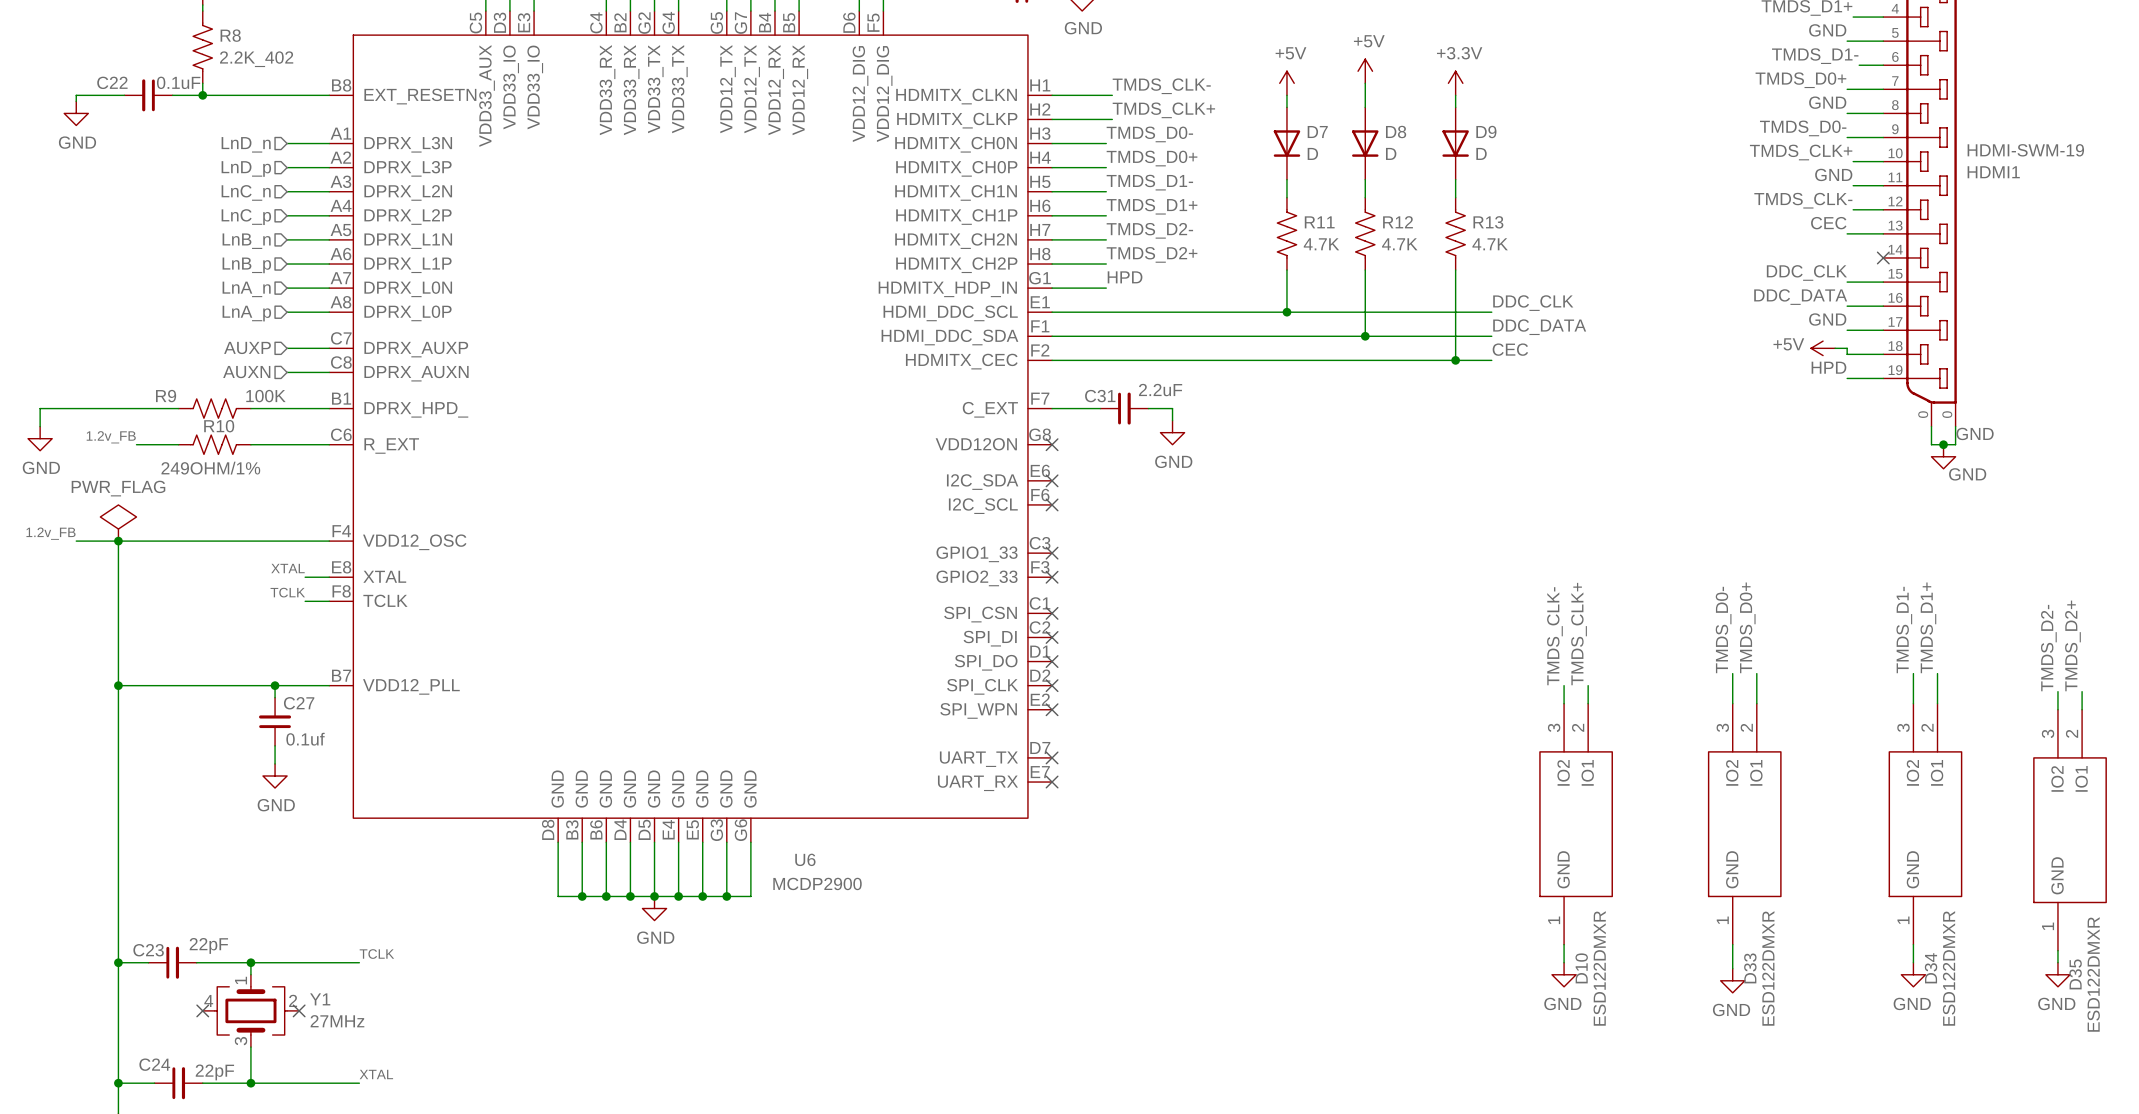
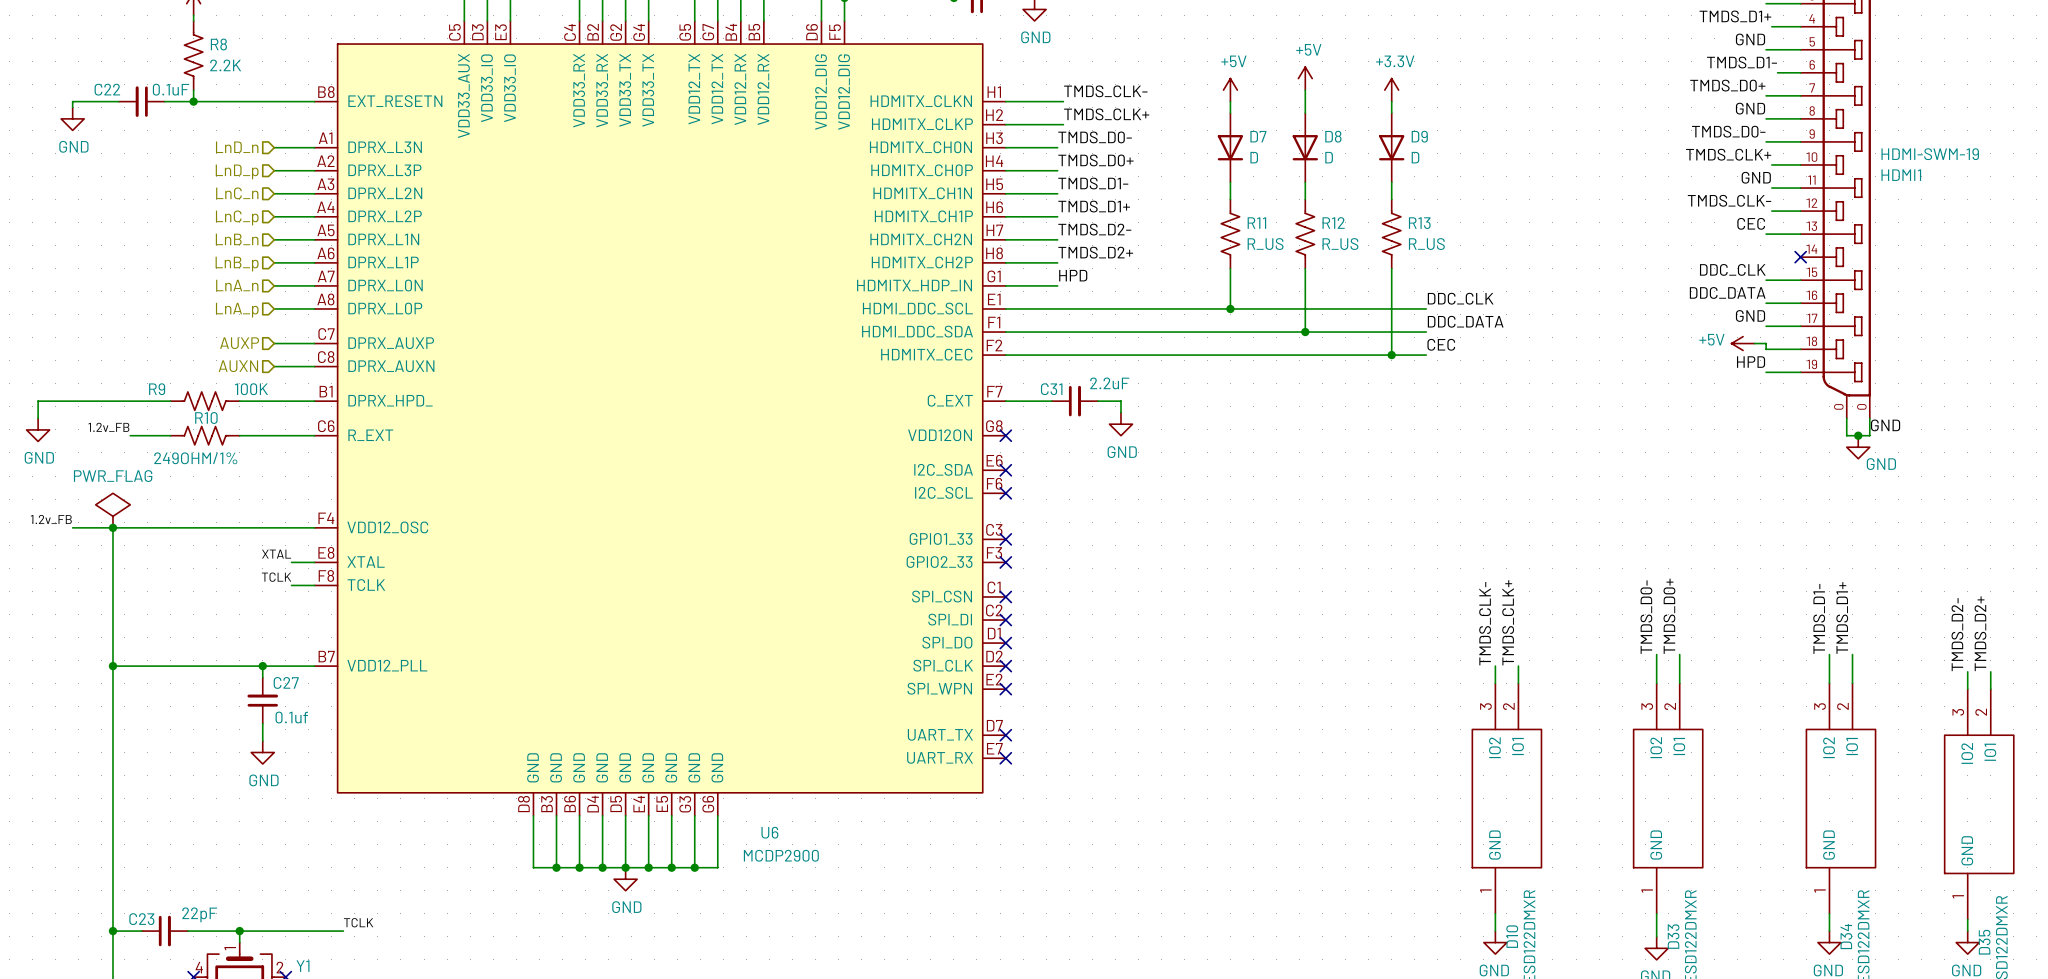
R8 value: 2.2K_402 (256, 59) -> 2.2K (225, 65)
R11 value: 4.7K (1321, 244) -> R_US (1265, 244)
R12 value: 4.7K (1399, 244) -> R_US (1340, 244)
R13 value: 4.7K (1490, 244) -> R_US (1426, 244)

